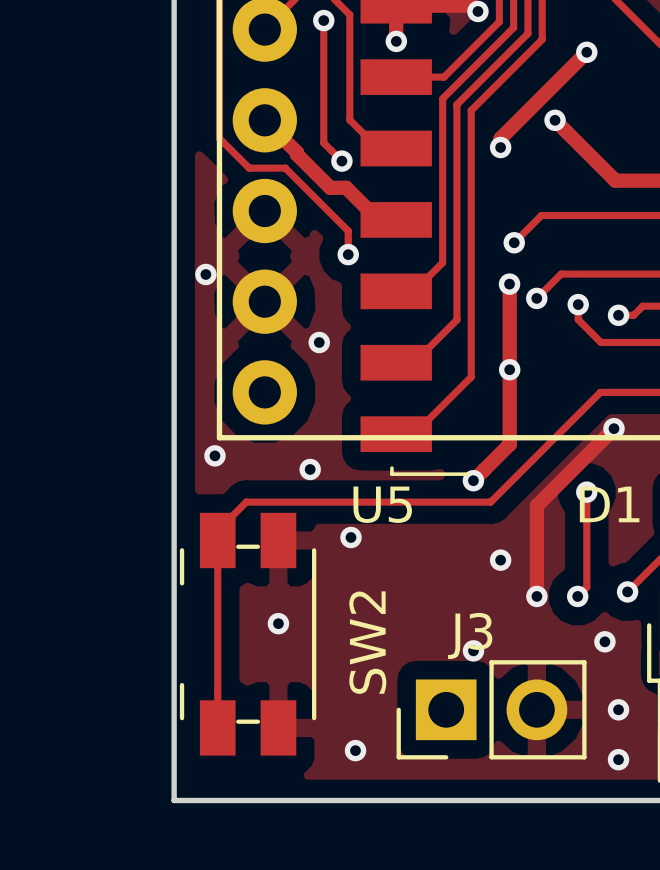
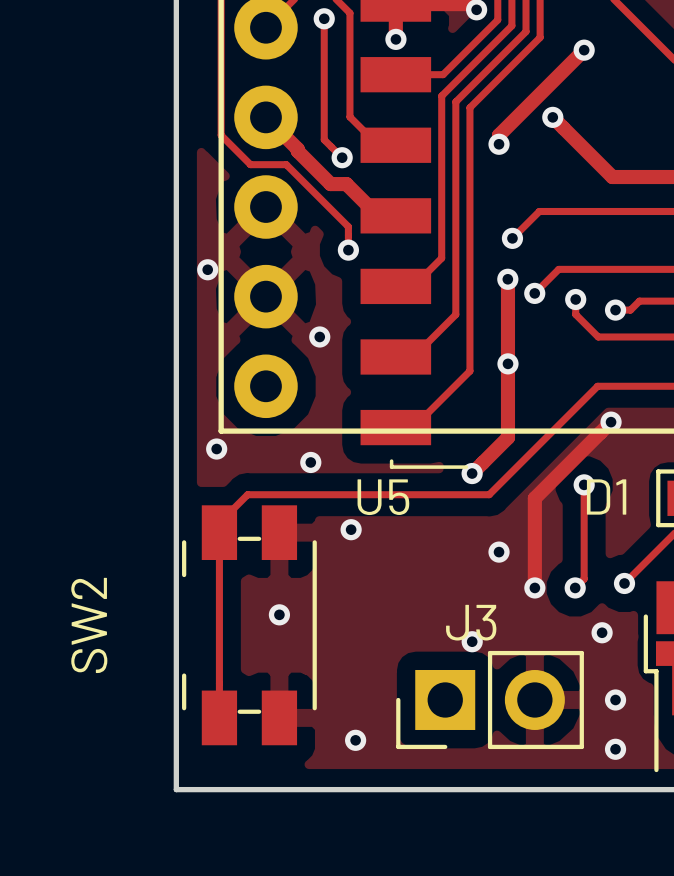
SW2 name position: SW2 (367, 642) -> SW2 (89, 625)

